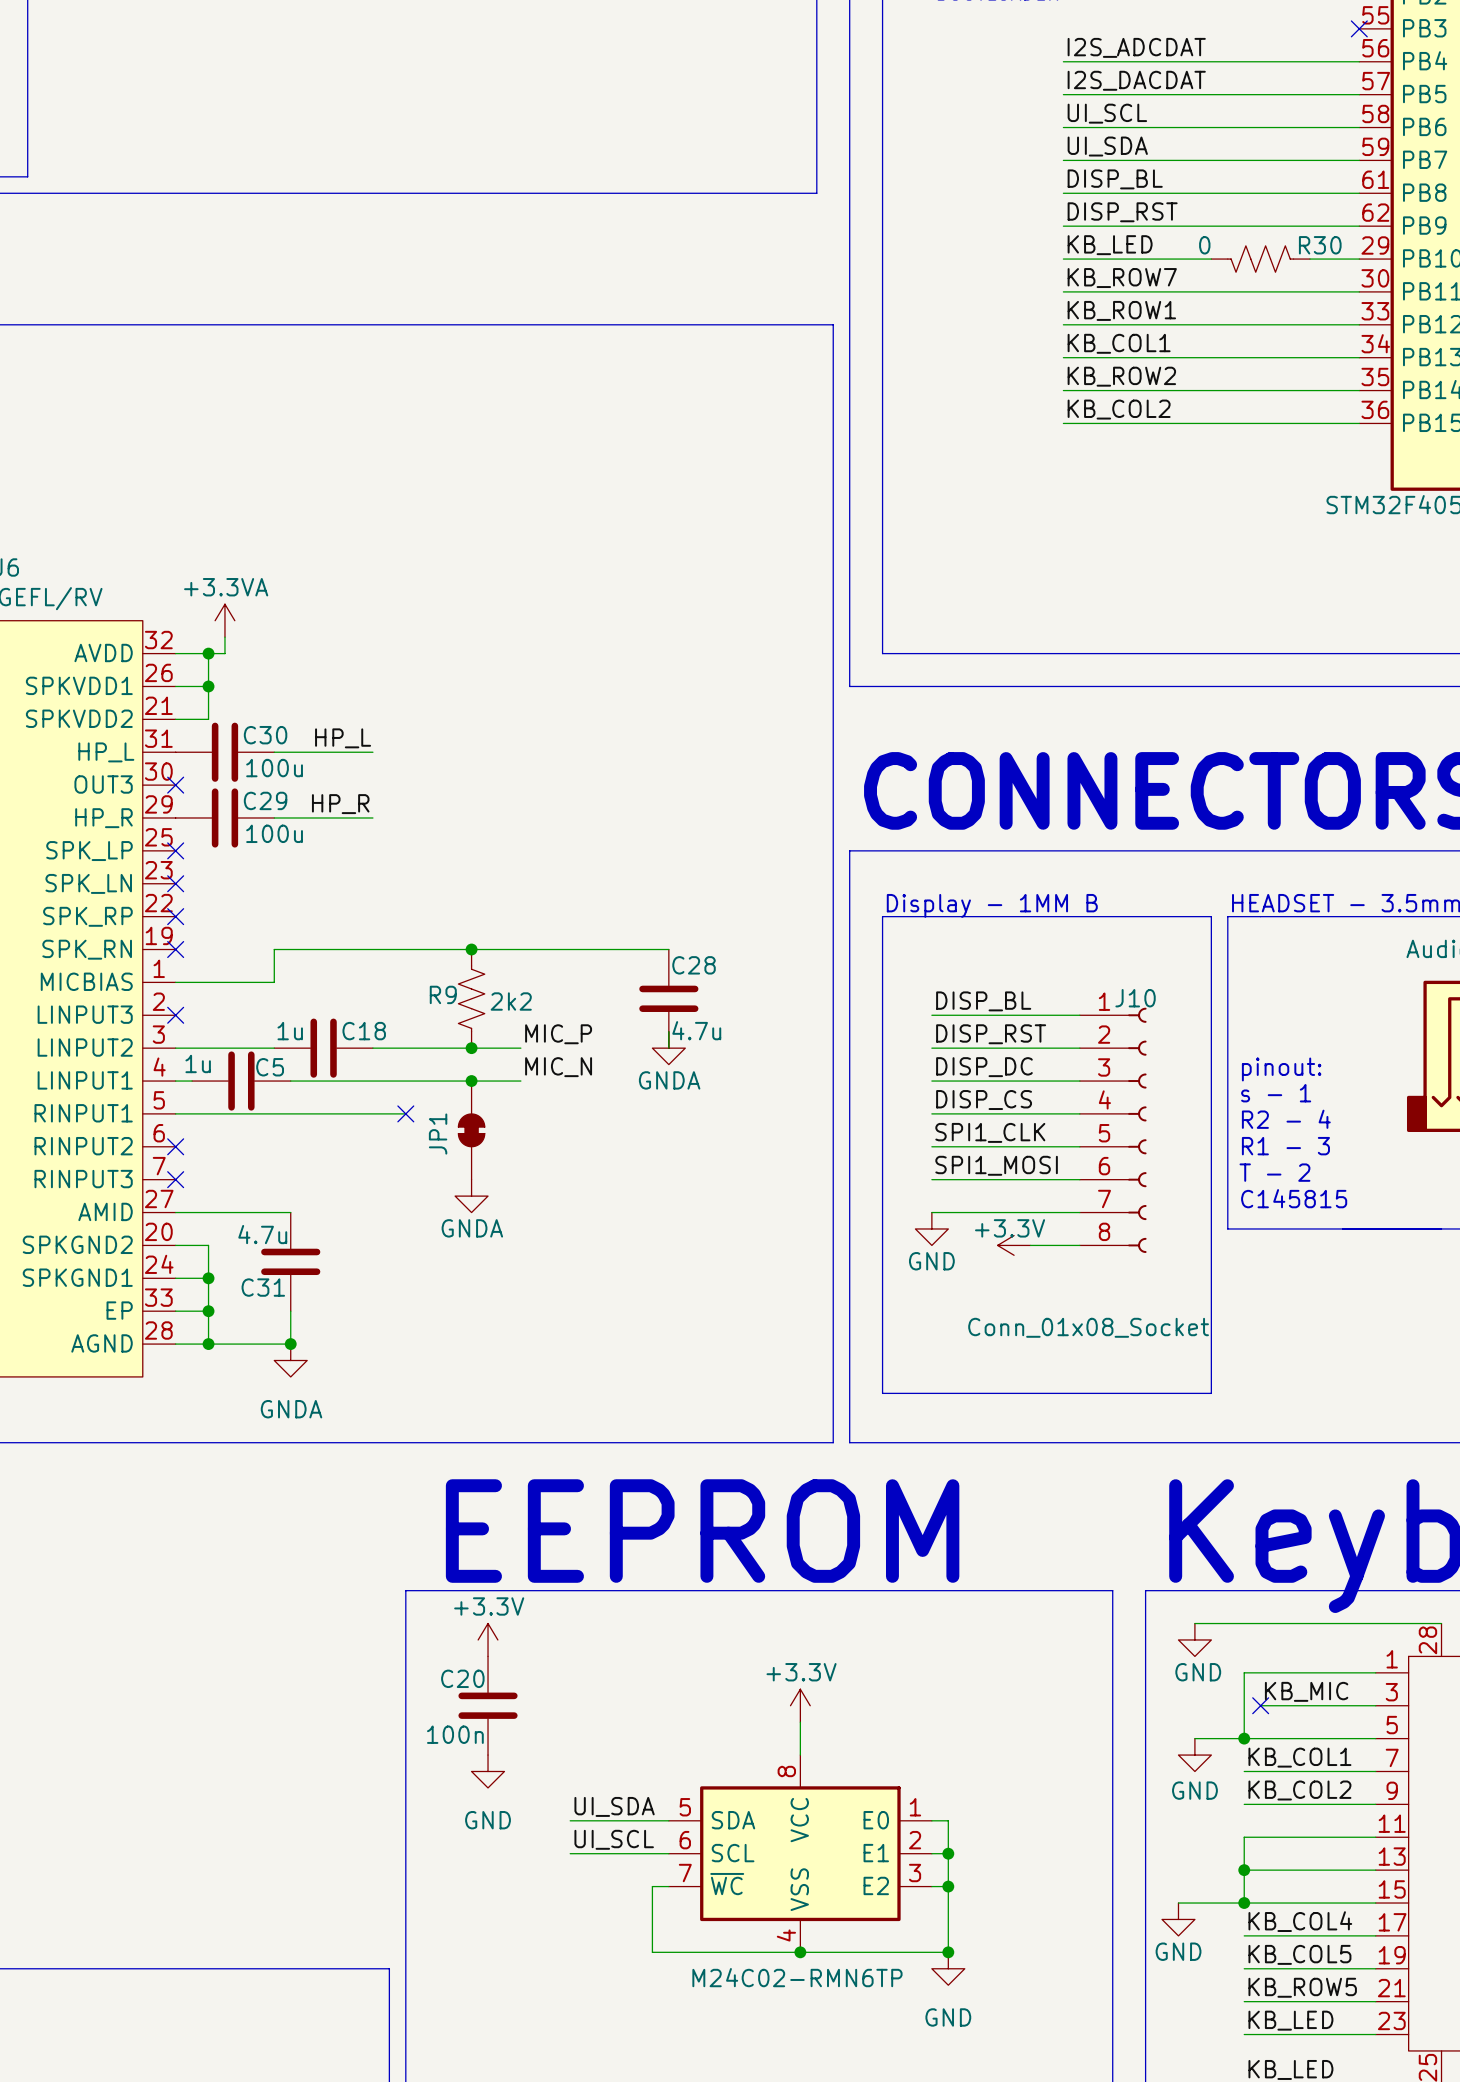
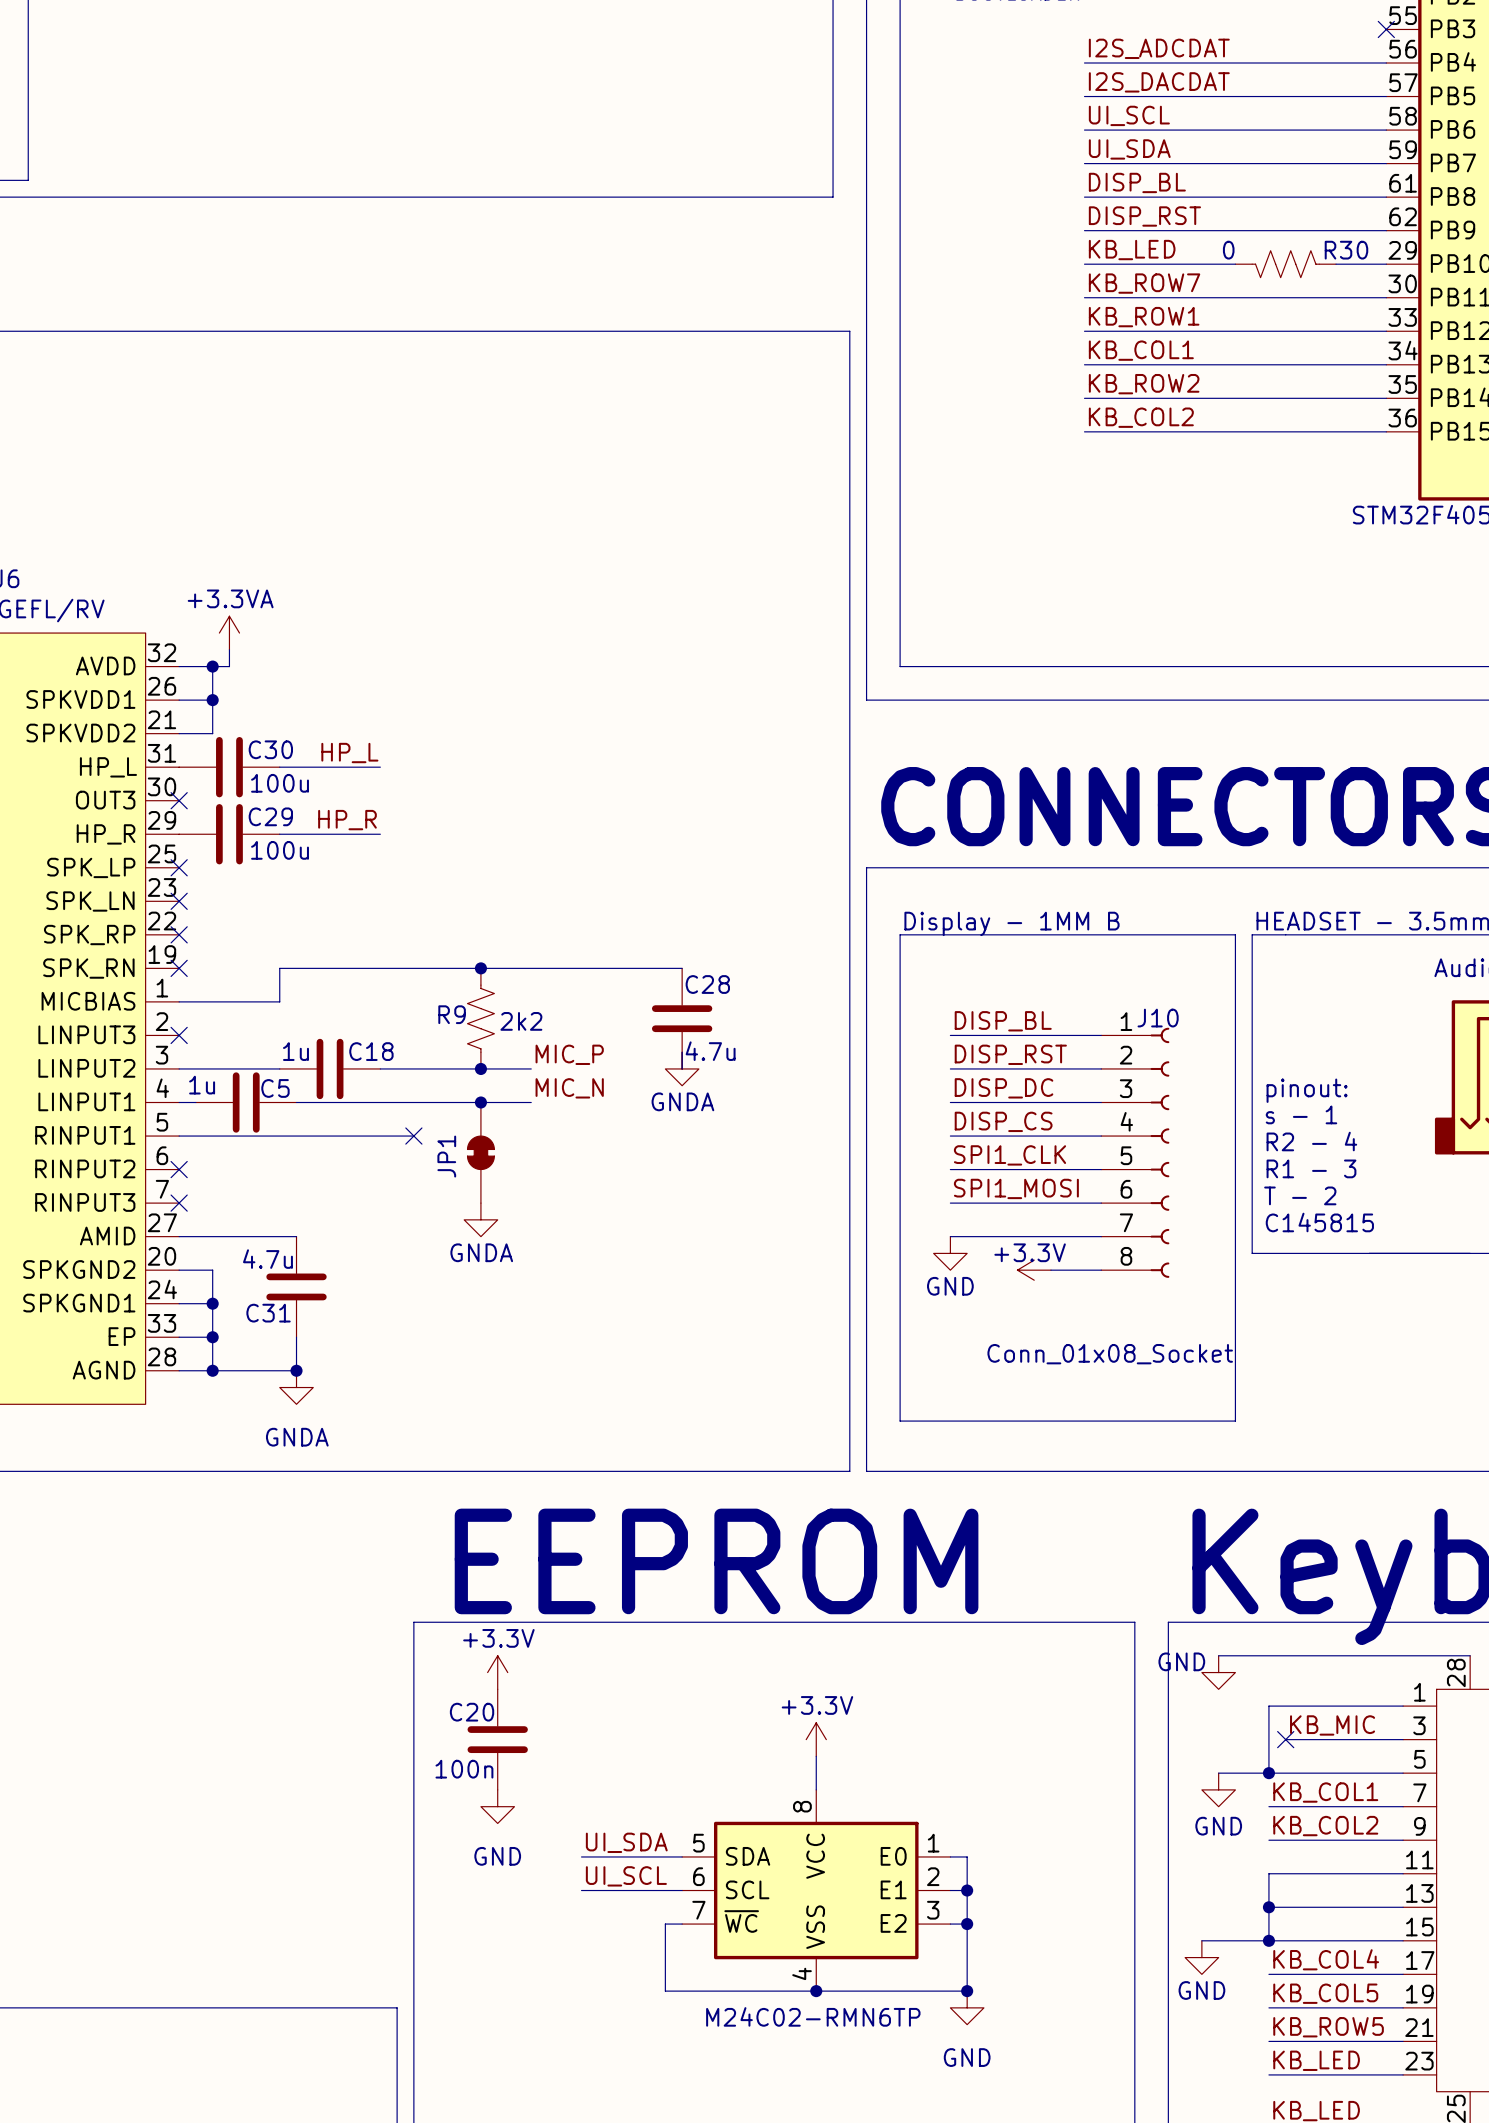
power symbol text position: GND (1198, 1672) -> GND (1181, 1661)

